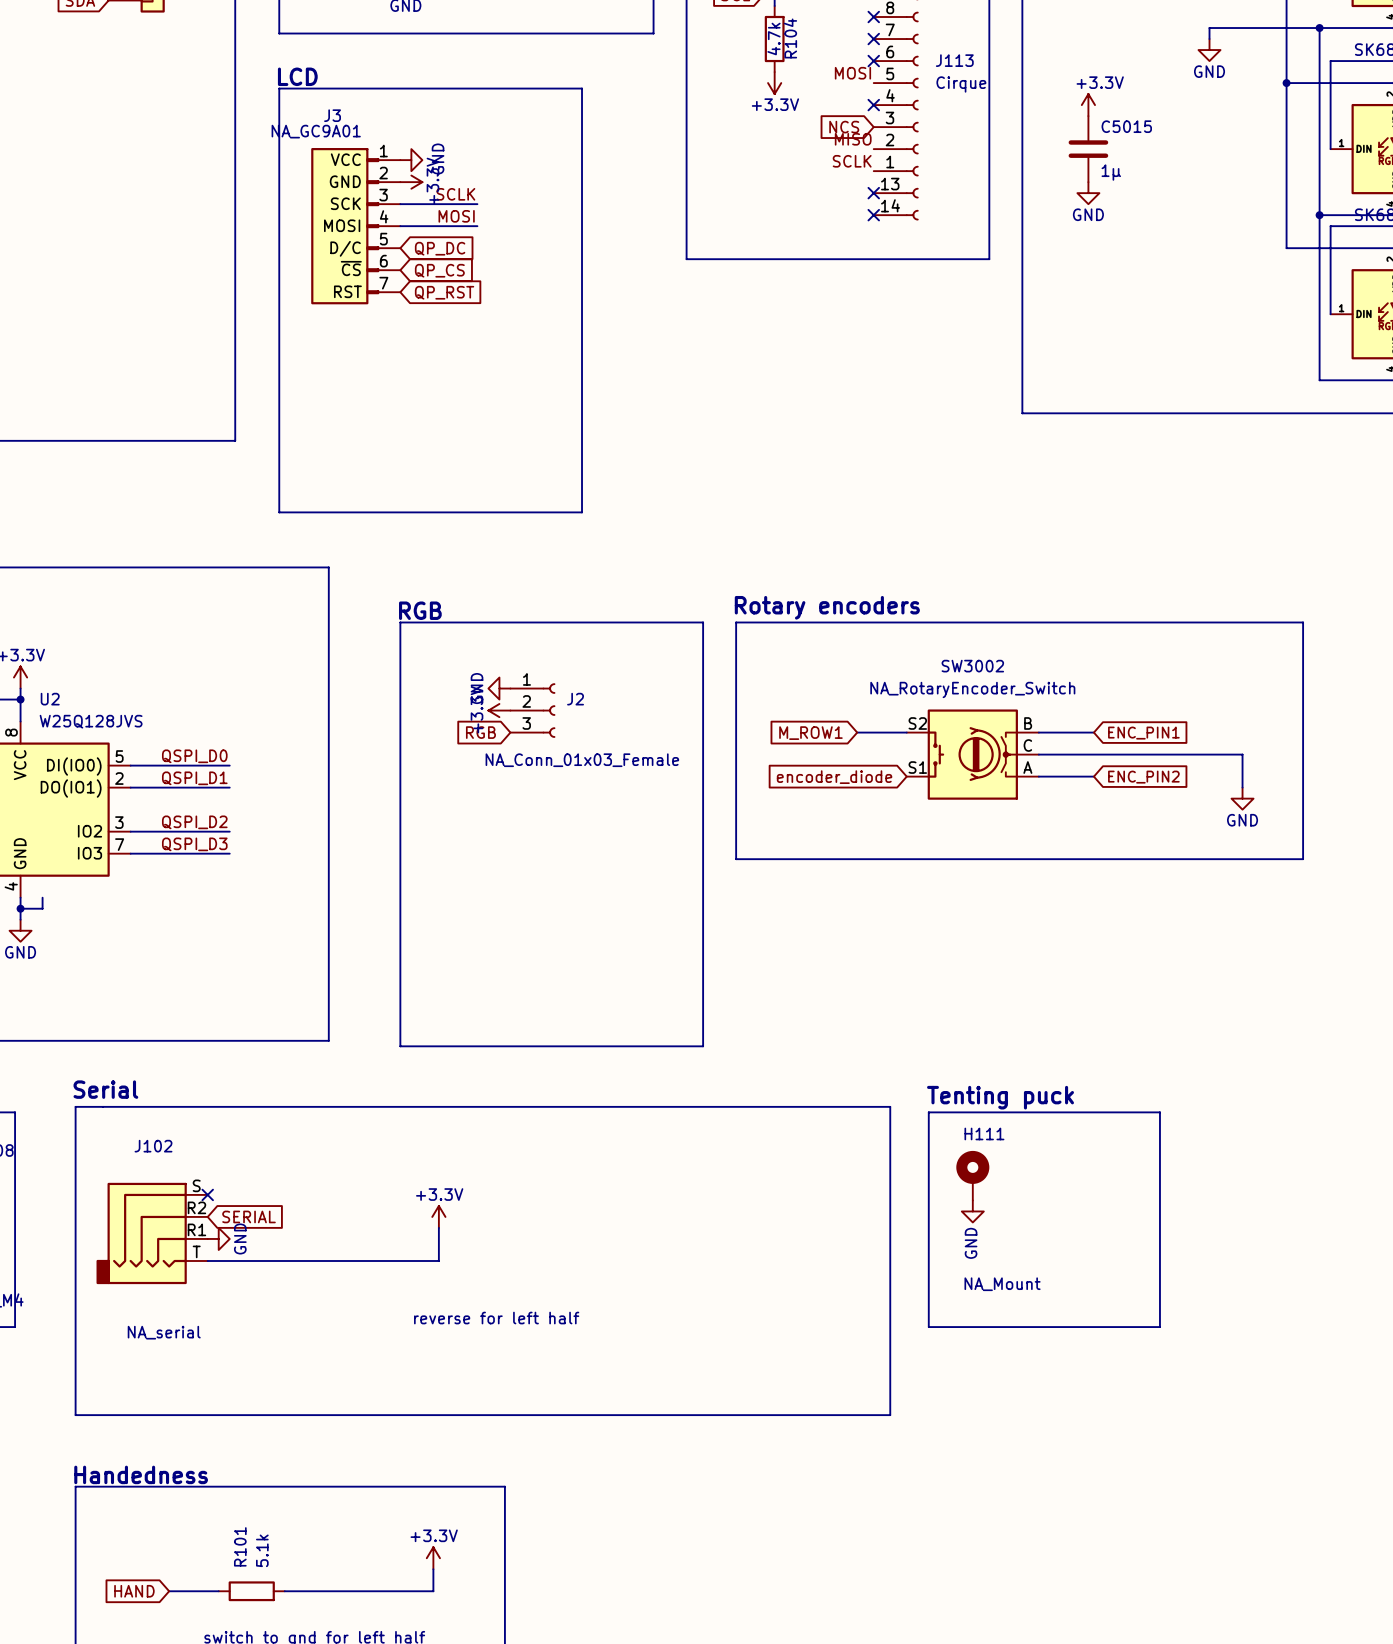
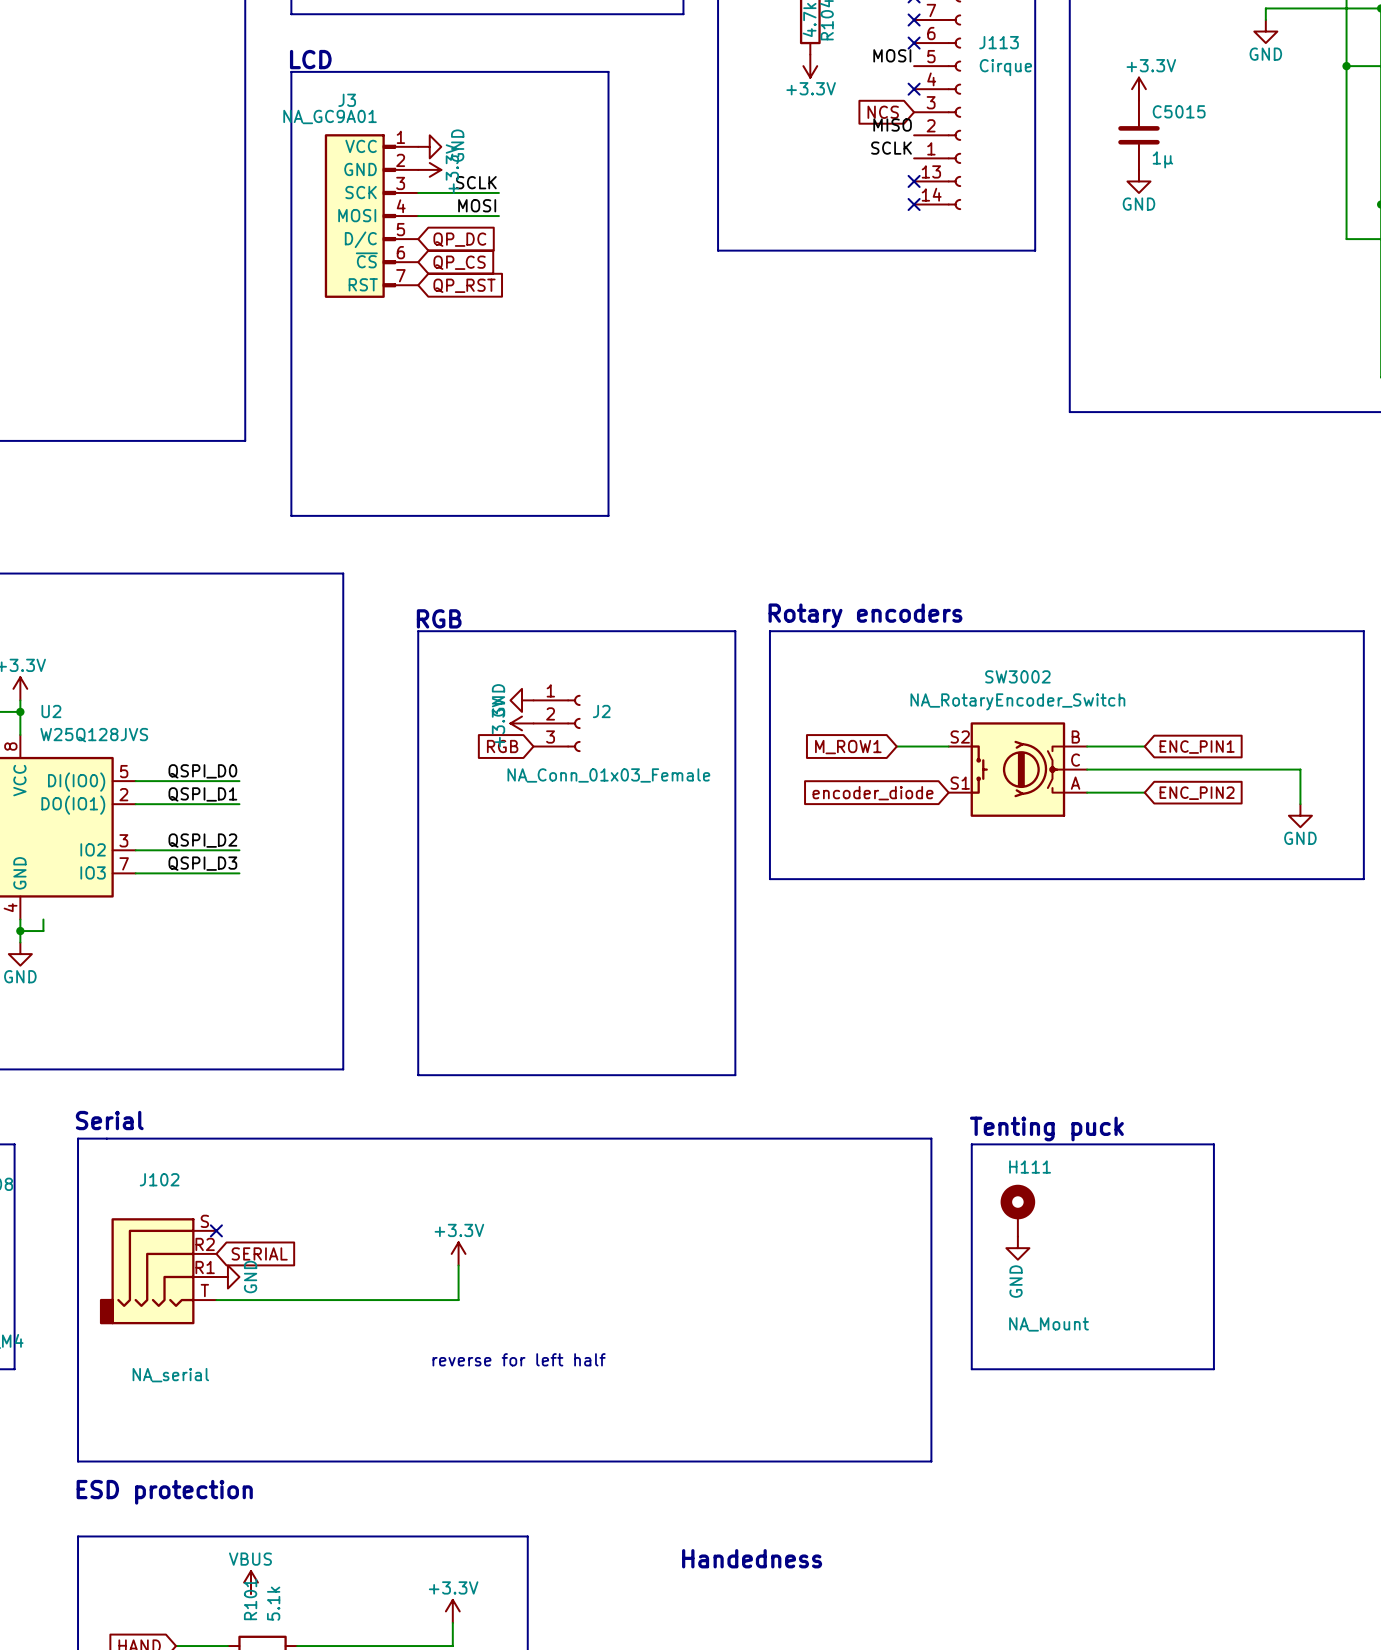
text: none -> ESD protection (164, 1492)
text: Handedness (141, 1474) -> none
text: none -> Handedness (752, 1558)
power symbol: none -> VBUS (251, 1582)

